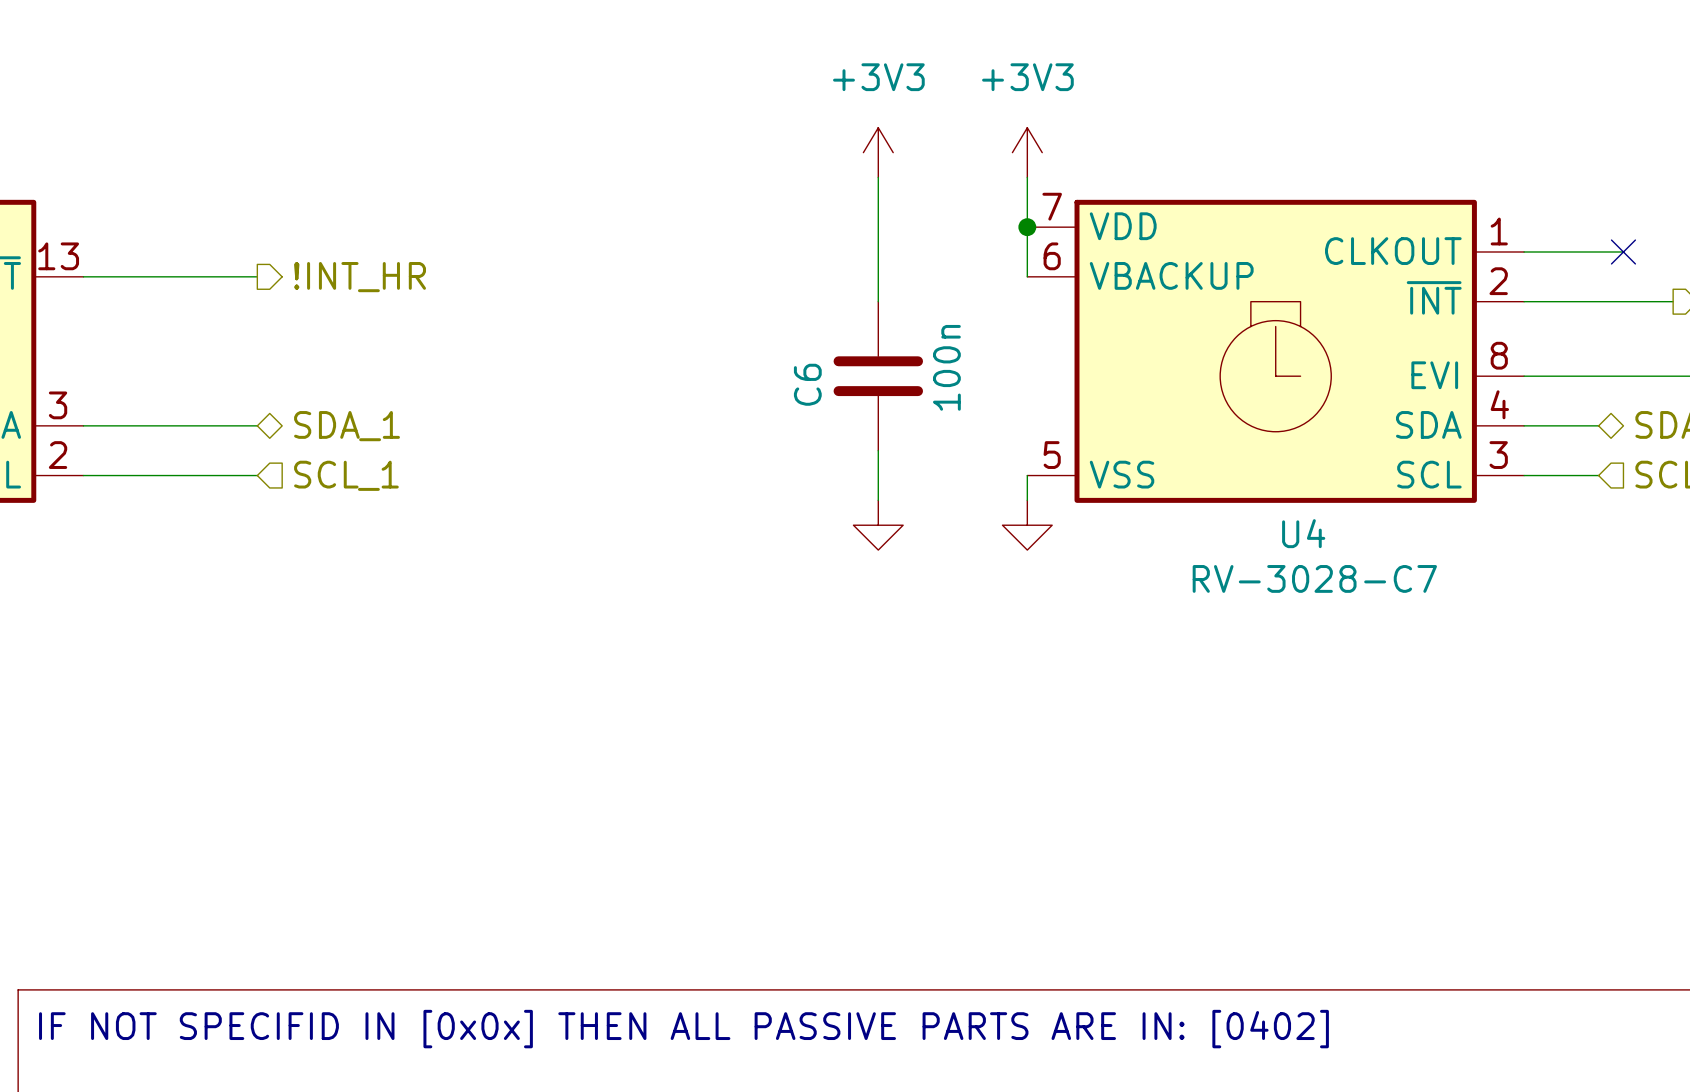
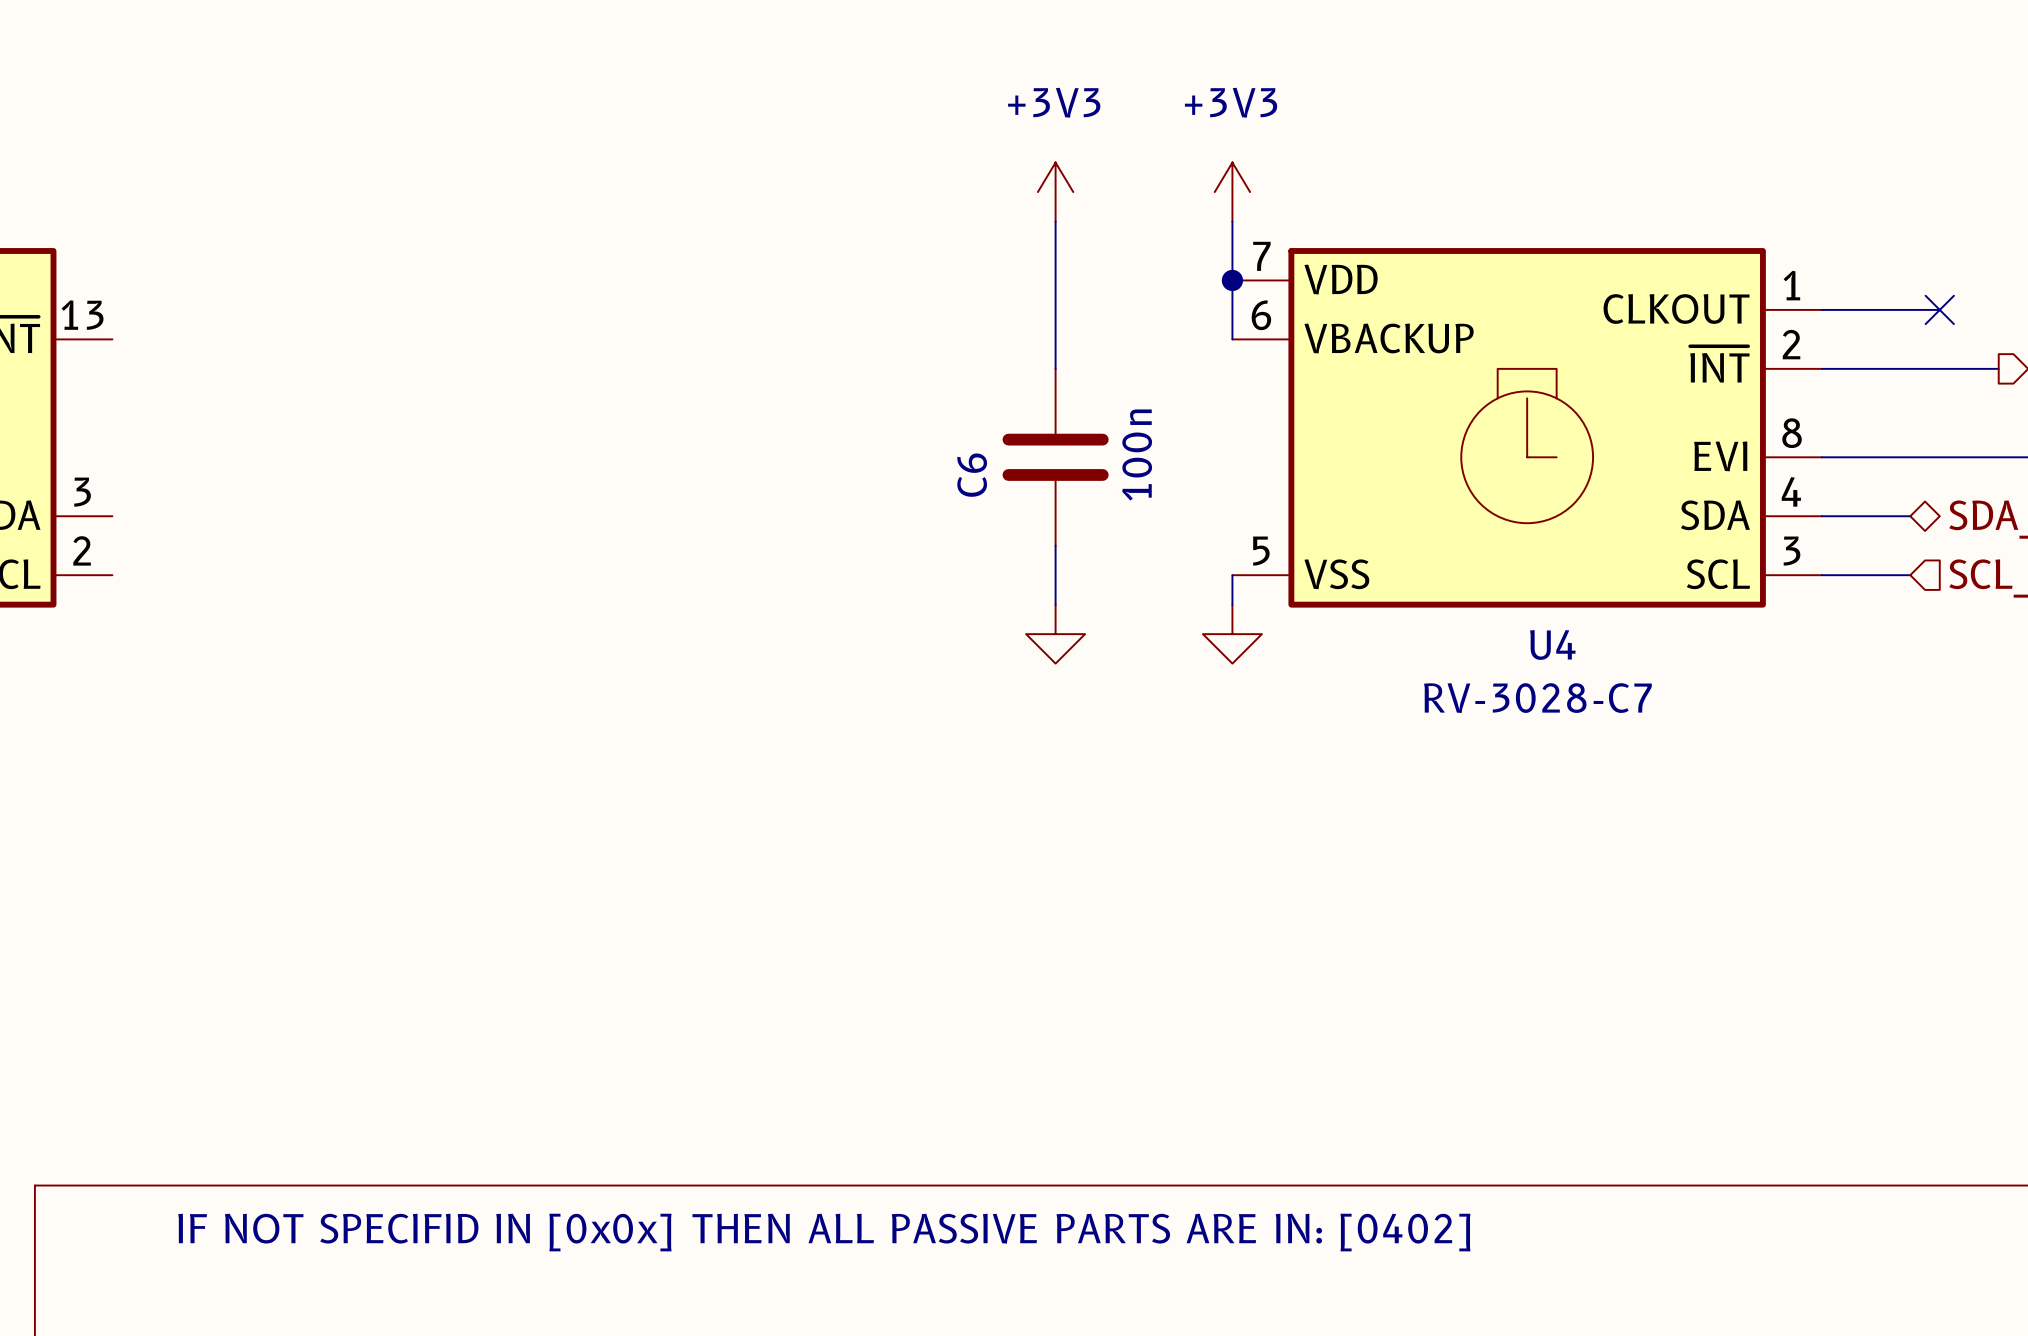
wire: (83, 276) (257, 276) -> none
hierarchical label: !INT_HR (360, 277) -> none
wire: (83, 425) (257, 425) -> none
hierarchical label: SDA_1 (347, 426) -> none
wire: (83, 475) (257, 475) -> none
hierarchical label: SCL_1 (346, 475) -> none

